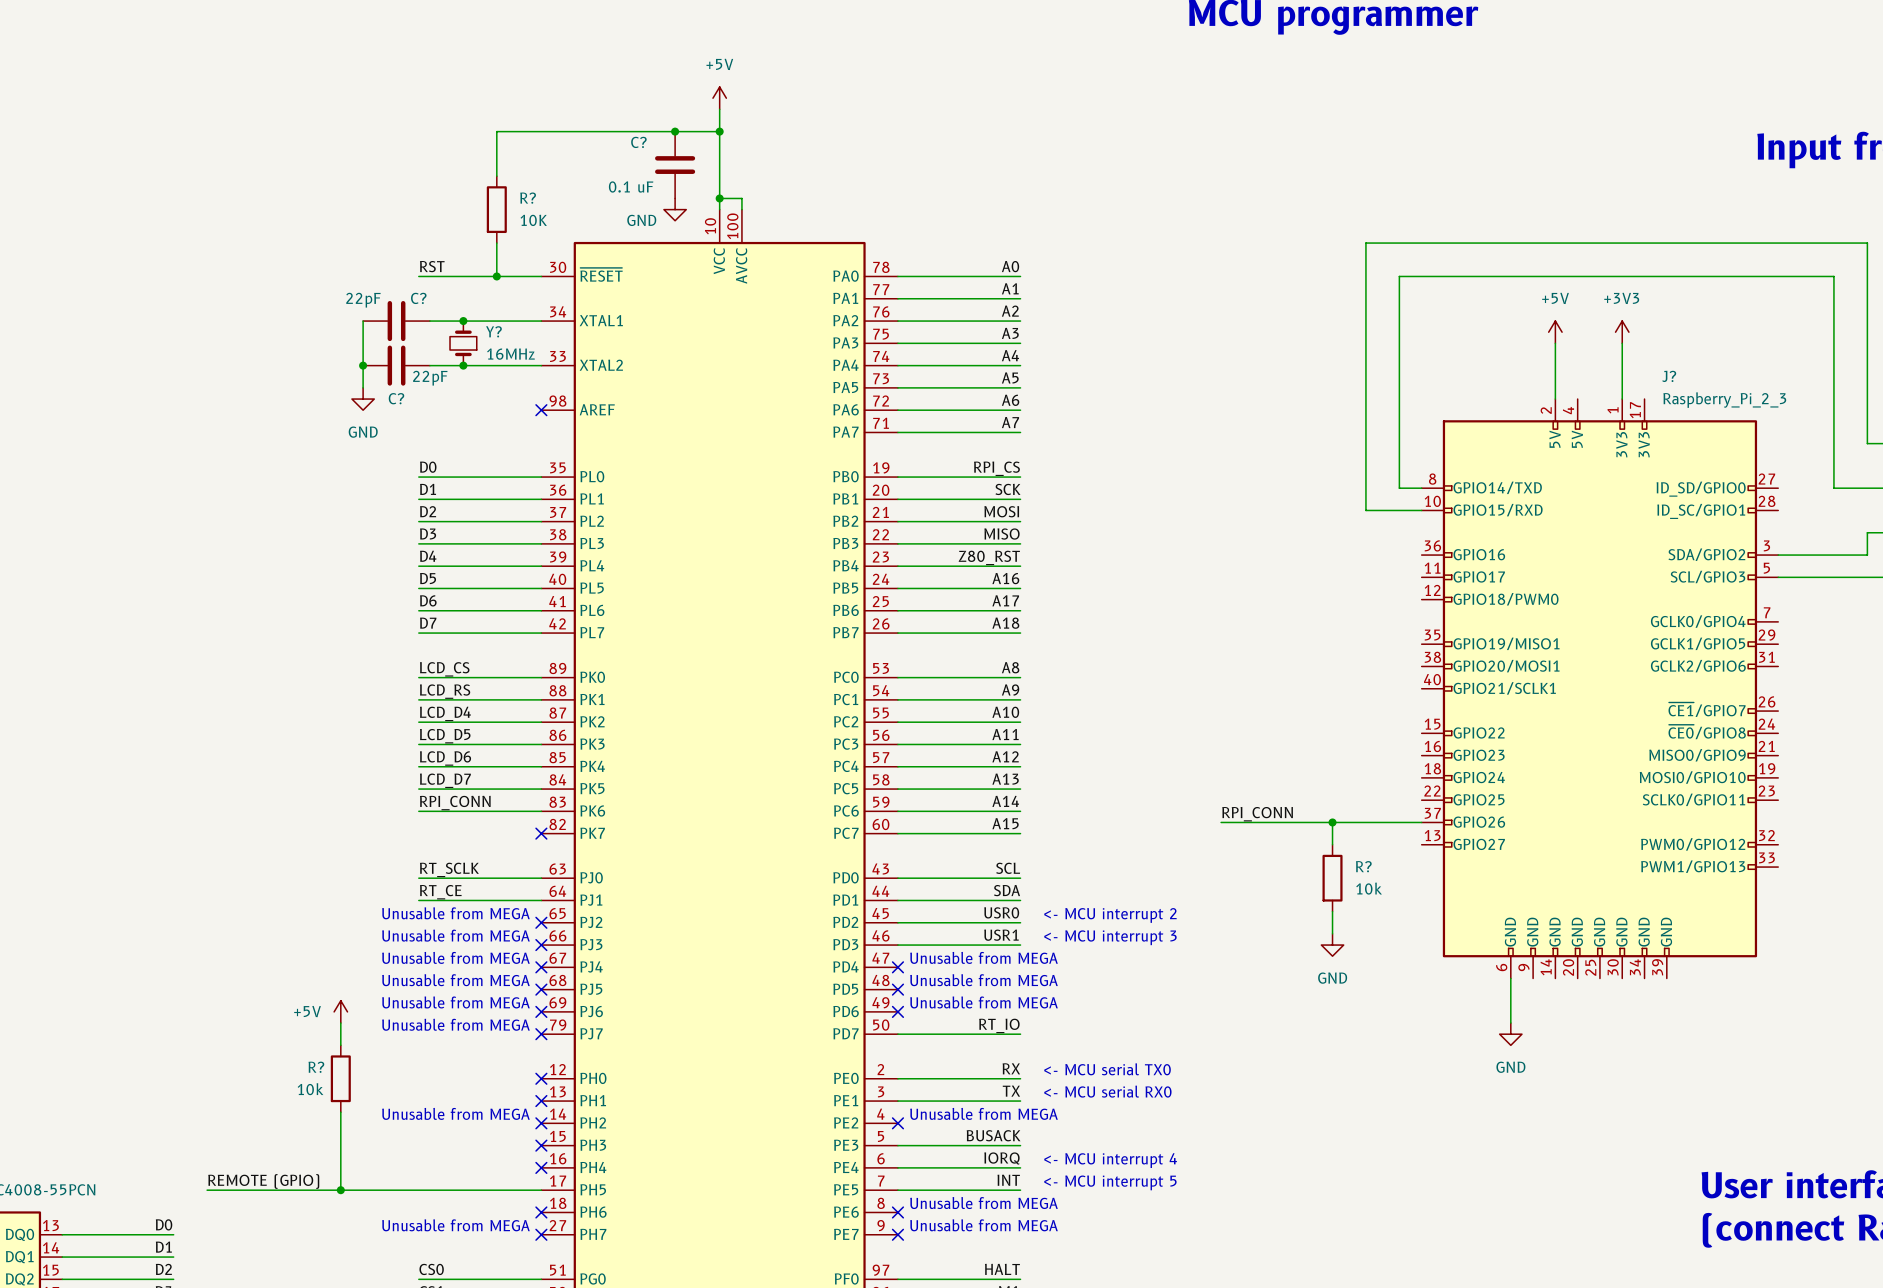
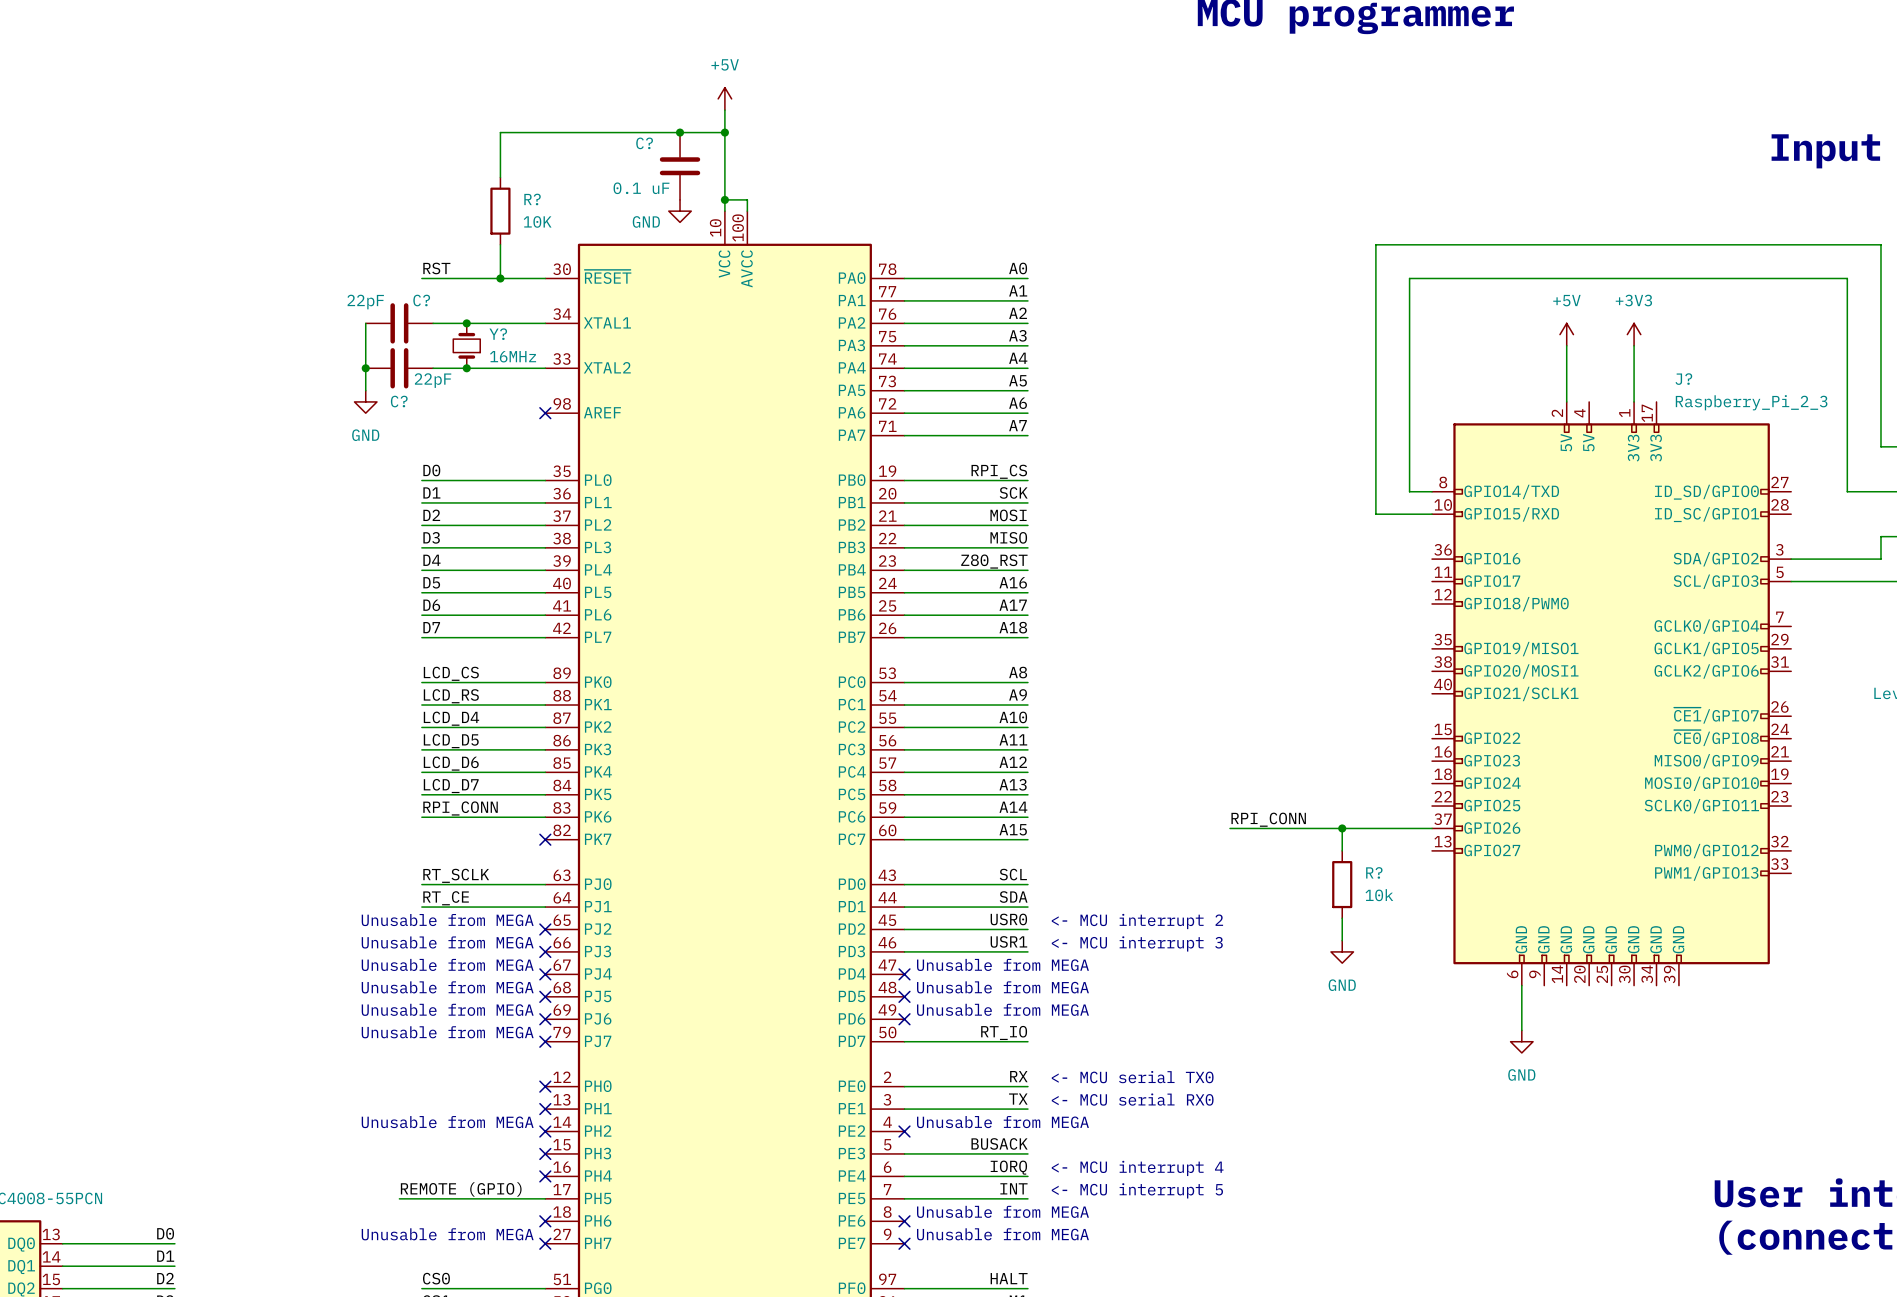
power symbol: +5V (340, 1011) -> none
wire: (340, 1023) (340, 1045) -> none
R?: 10k (340, 1078) -> none
wire: (340, 1112) (340, 1190) -> none
label position: REMOTE (GPIO) (263, 1181) -> REMOTE (GPIO) (461, 1189)
wire: (207, 1190) (396, 1190) -> none
junction: (340, 1190) -> none

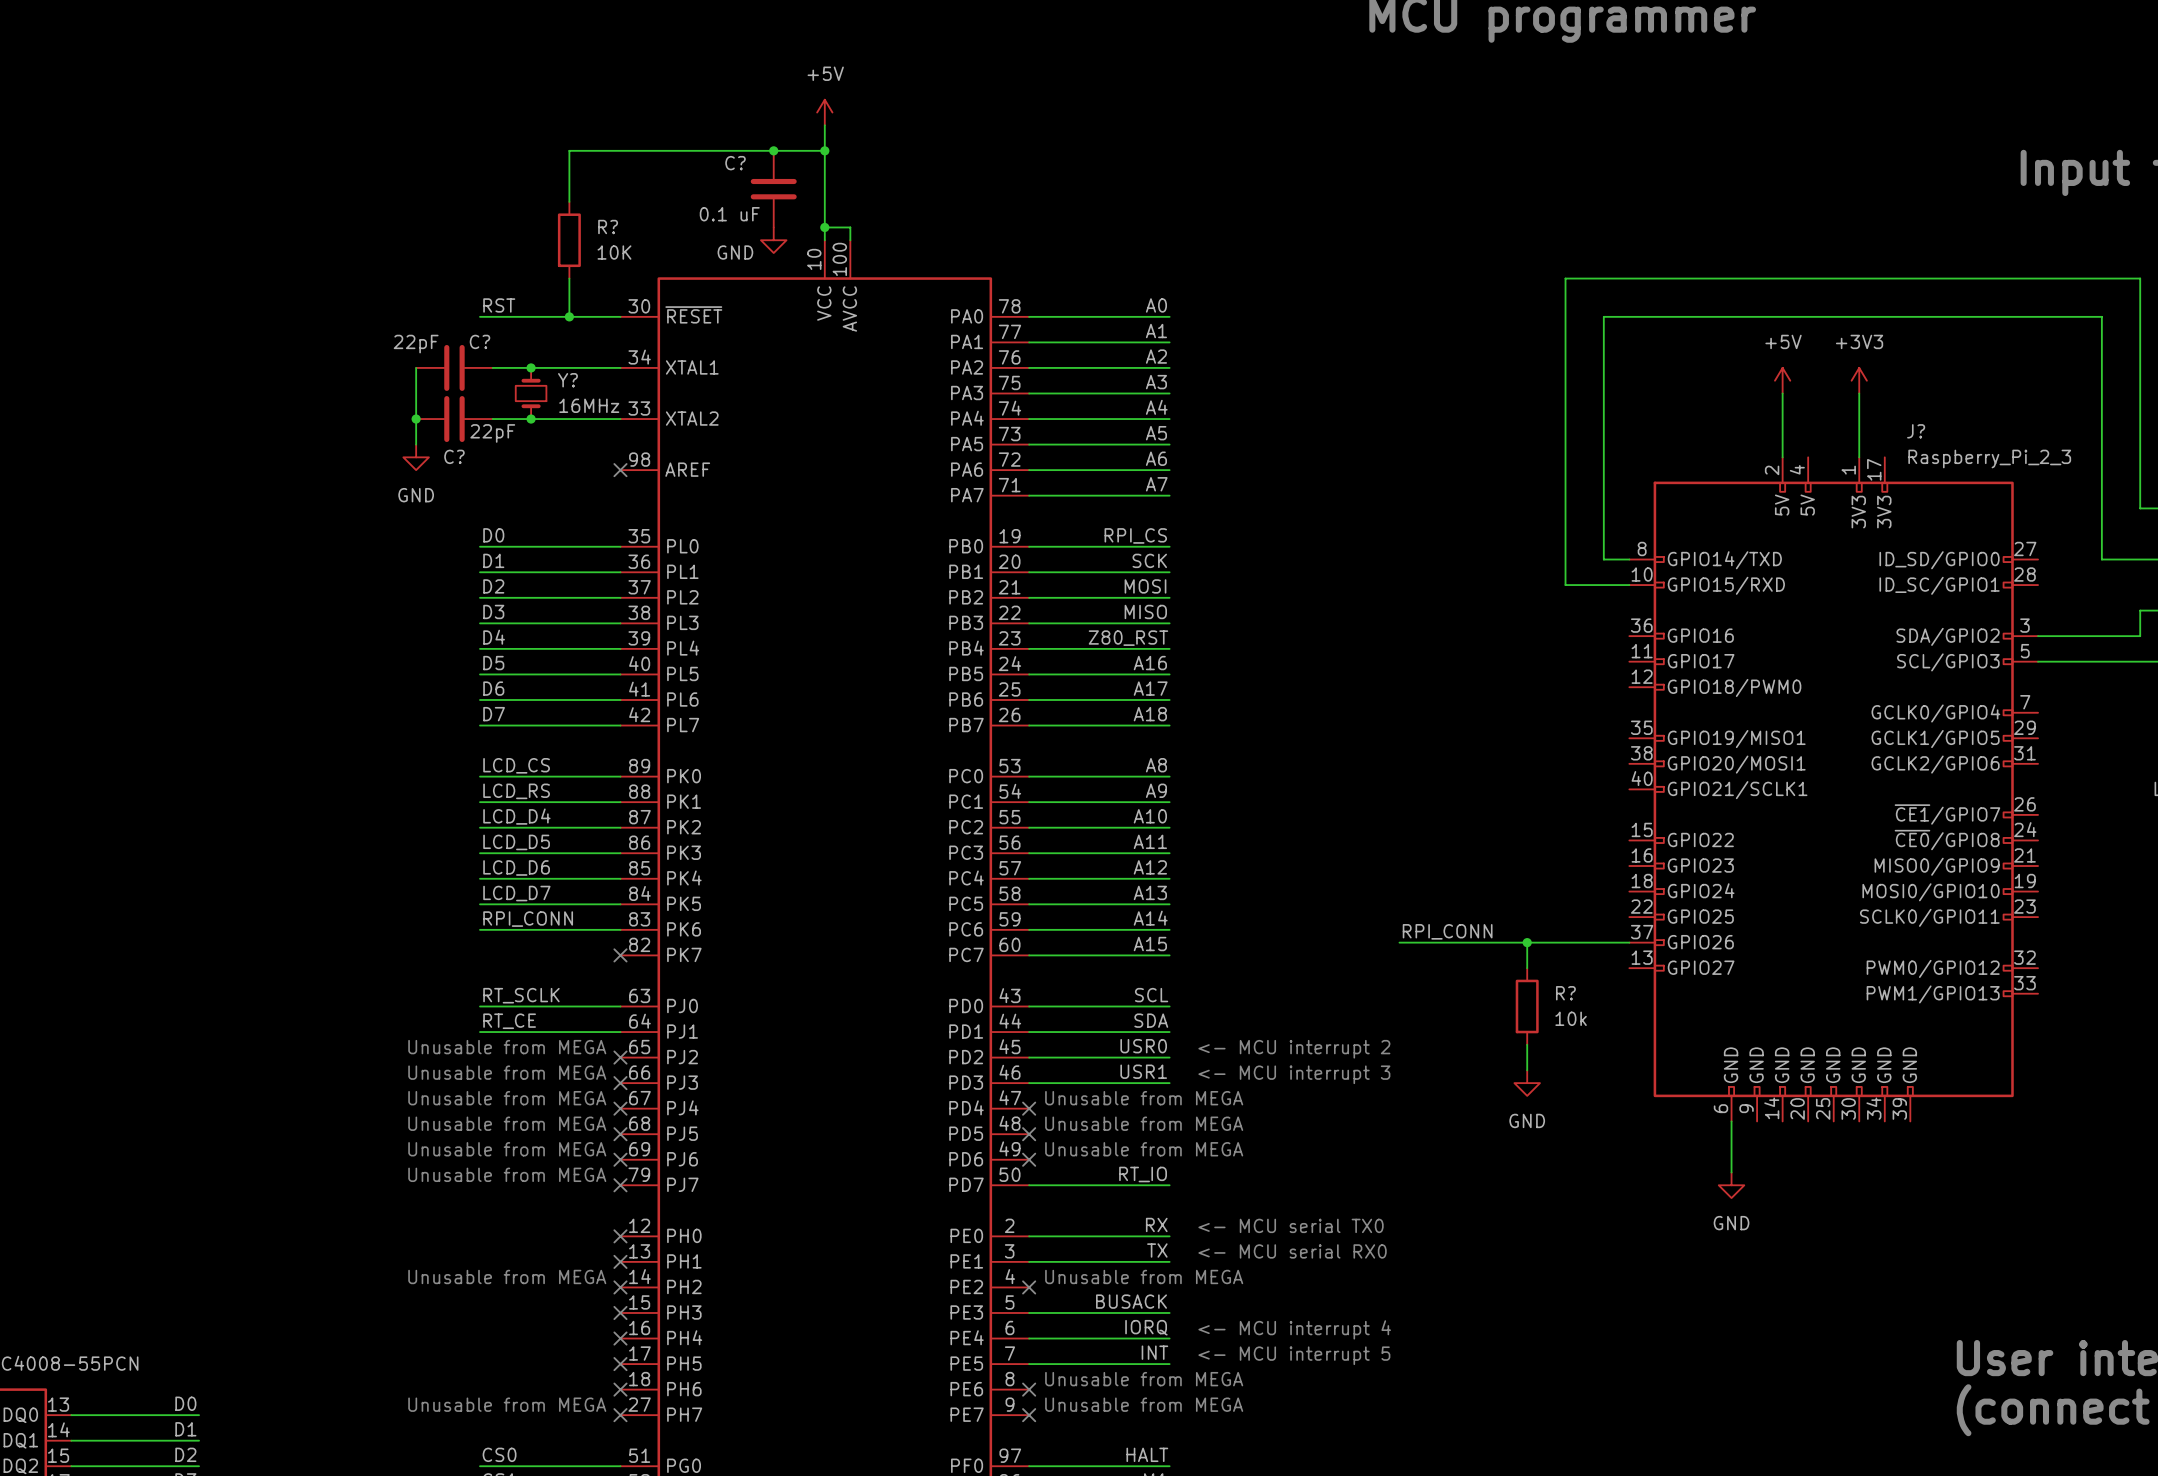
label: REMOTE (GPIO) (461, 1189) -> none
wire: (399, 1198) (545, 1198) -> none
no-connect mark: none -> (620, 1364)

